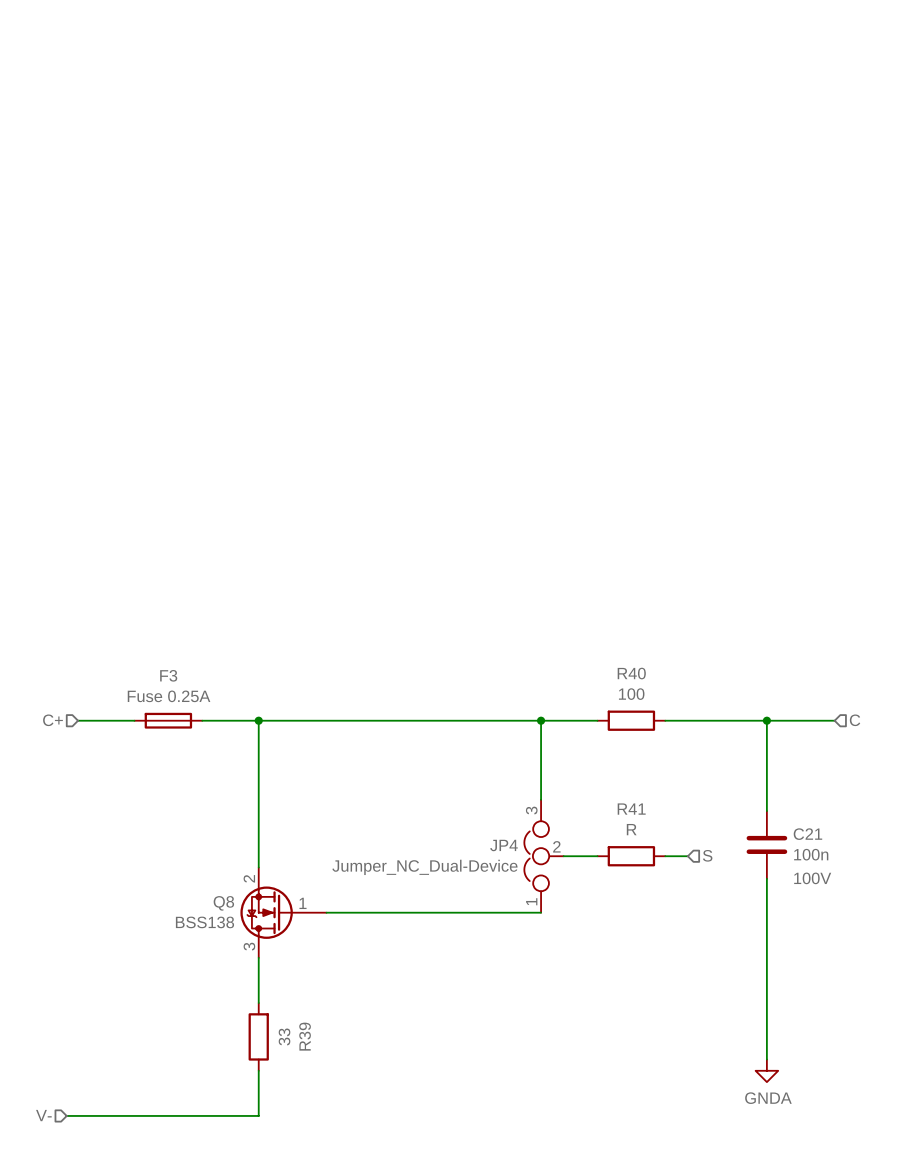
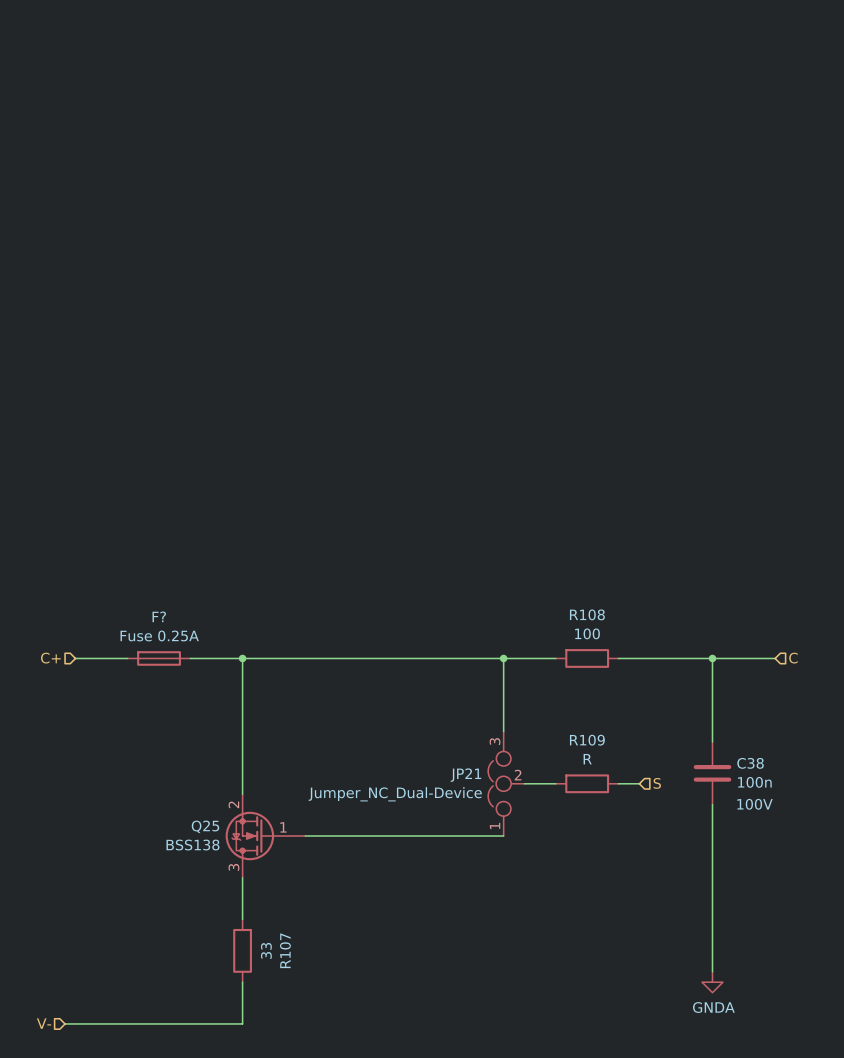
R40 name: R40 (631, 673) -> R108 (587, 614)
F3 name: F3 (168, 675) -> F? (159, 616)
R41 name: R41 (631, 809) -> R109 (587, 740)
C21 name: C21 (807, 834) -> C38 (750, 763)
JP4 name: JP4 (503, 845) -> JP21 (465, 775)
Q8 name: Q8 (223, 903) -> Q25 (205, 826)
R39 name: R39 (305, 1036) -> R107 (285, 950)

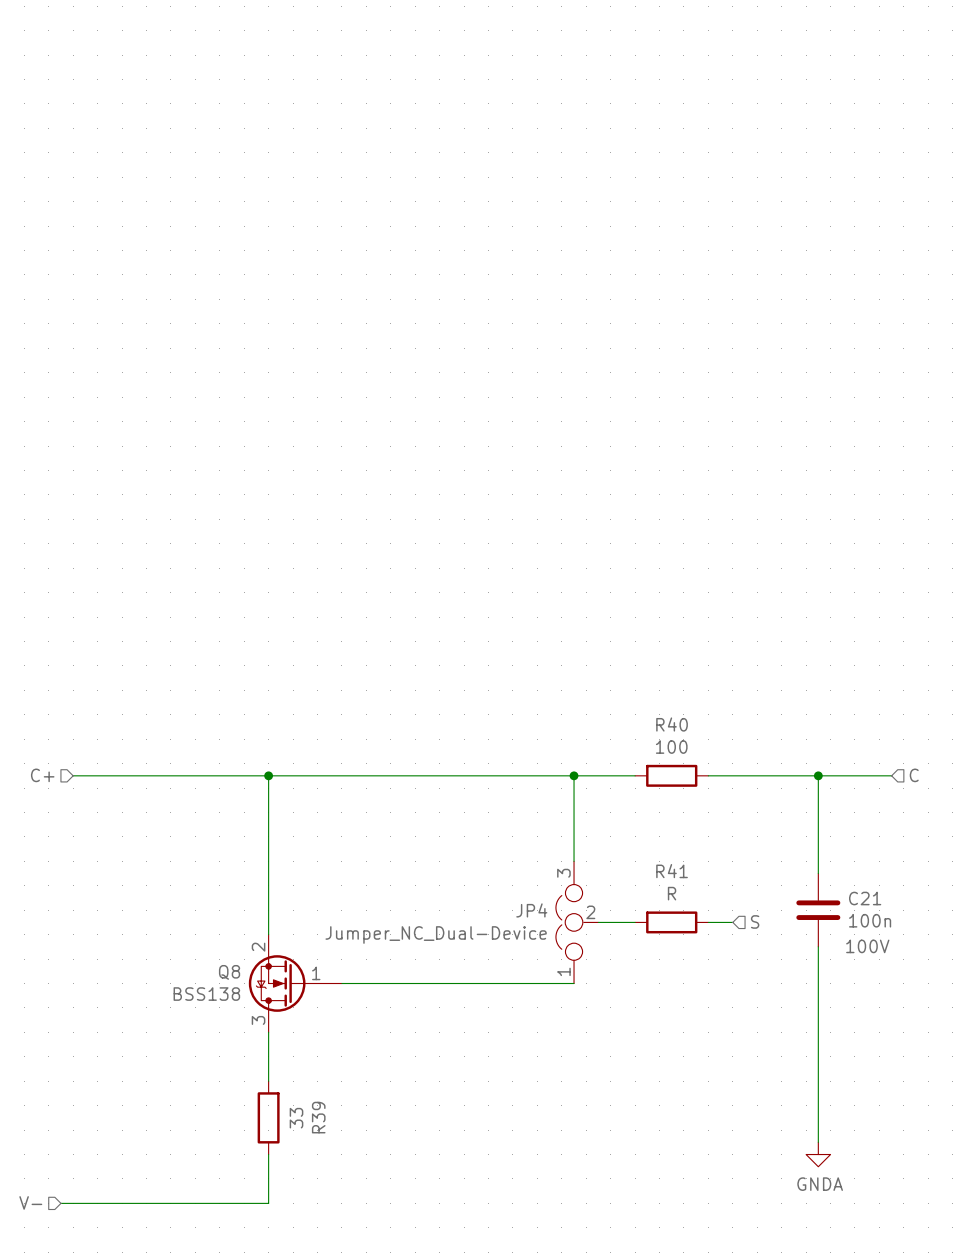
R108 name: R108 (587, 614) -> R40 (672, 724)
F?: Fuse 0.25A (159, 658) -> none
R109 name: R109 (587, 740) -> R41 (672, 871)
C38 name: C38 (750, 763) -> C21 (865, 898)
JP21 name: JP21 (465, 775) -> JP4 (531, 910)
Q25 name: Q25 (205, 826) -> Q8 (229, 972)
R107 name: R107 (285, 950) -> R39 (318, 1117)

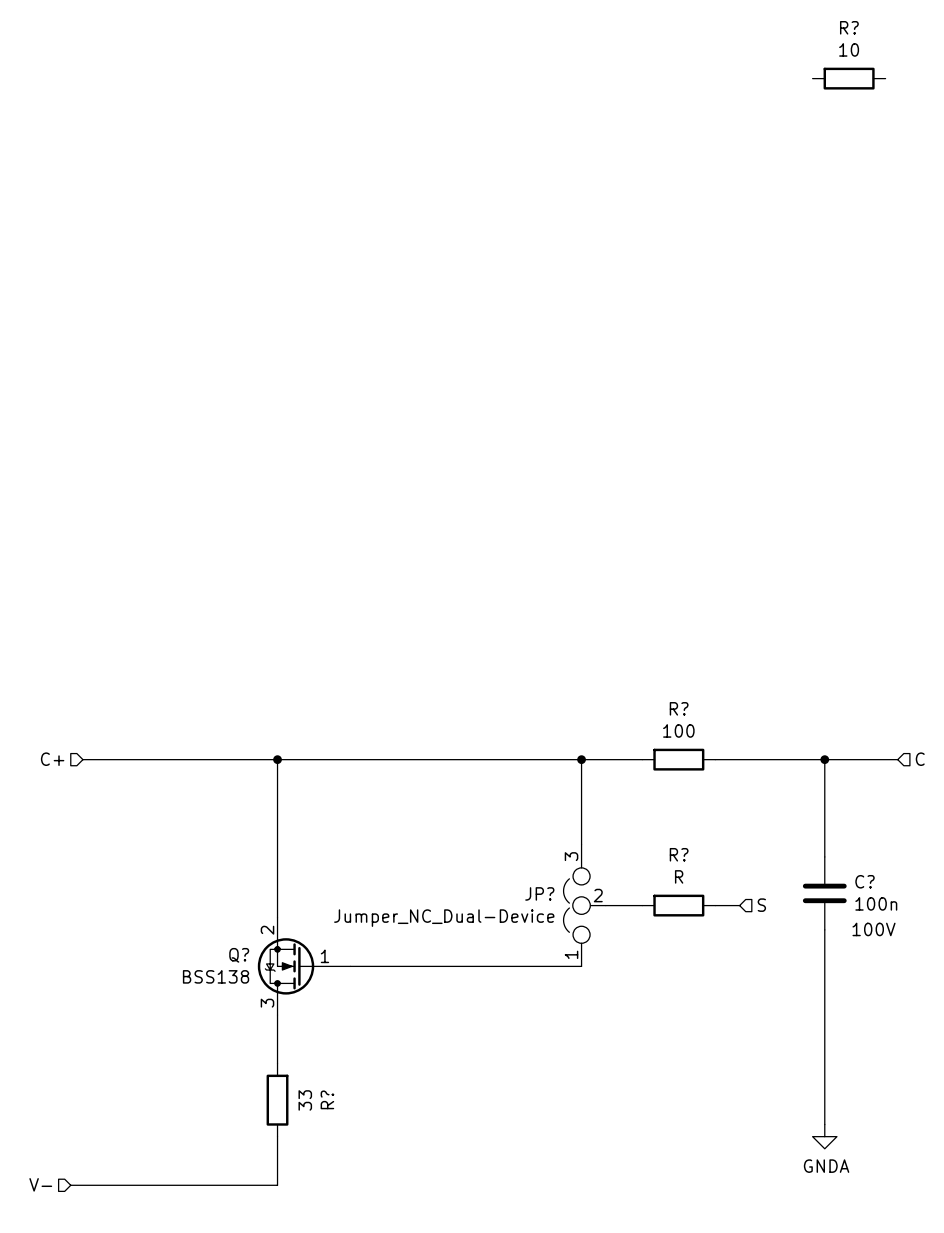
R?: none -> 10 (849, 78)
R40 name: R40 (672, 724) -> R? (679, 708)
R41 name: R41 (672, 871) -> R? (679, 854)
C21 name: C21 (865, 898) -> C? (865, 881)
JP4 name: JP4 (531, 910) -> JP? (539, 893)
Q8 name: Q8 (229, 972) -> Q? (239, 955)
R39 name: R39 (318, 1117) -> R? (327, 1099)

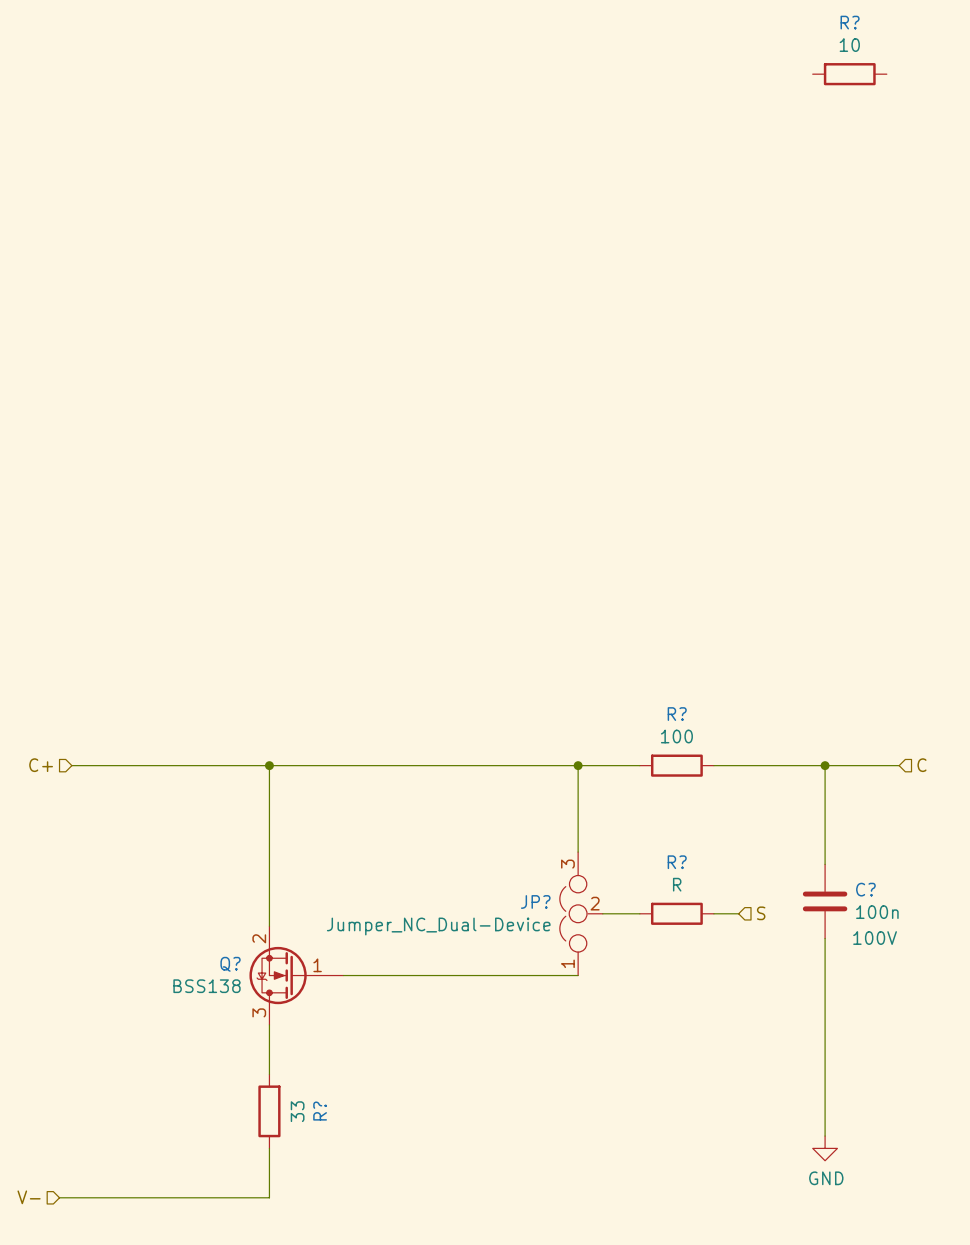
power symbol: GNDA (824, 1136) -> GND (825, 1148)

